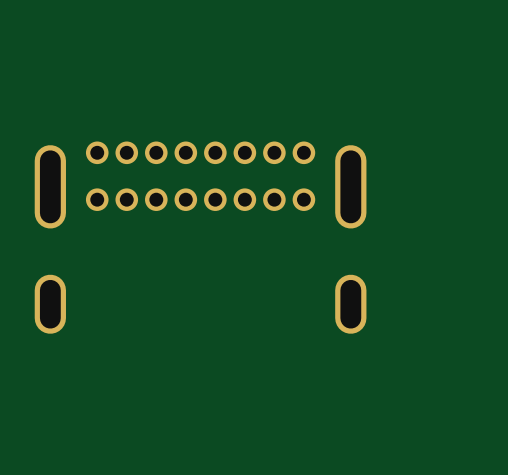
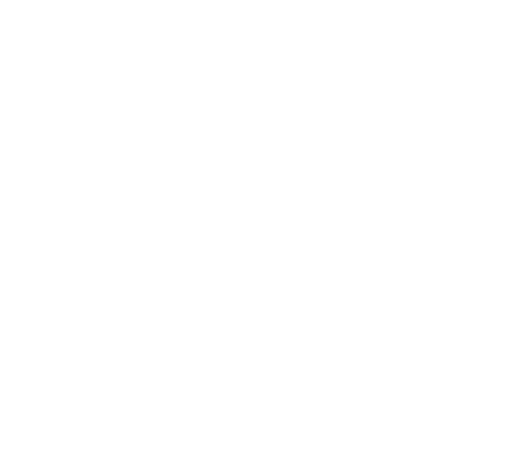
part: (200, 237) -> none

